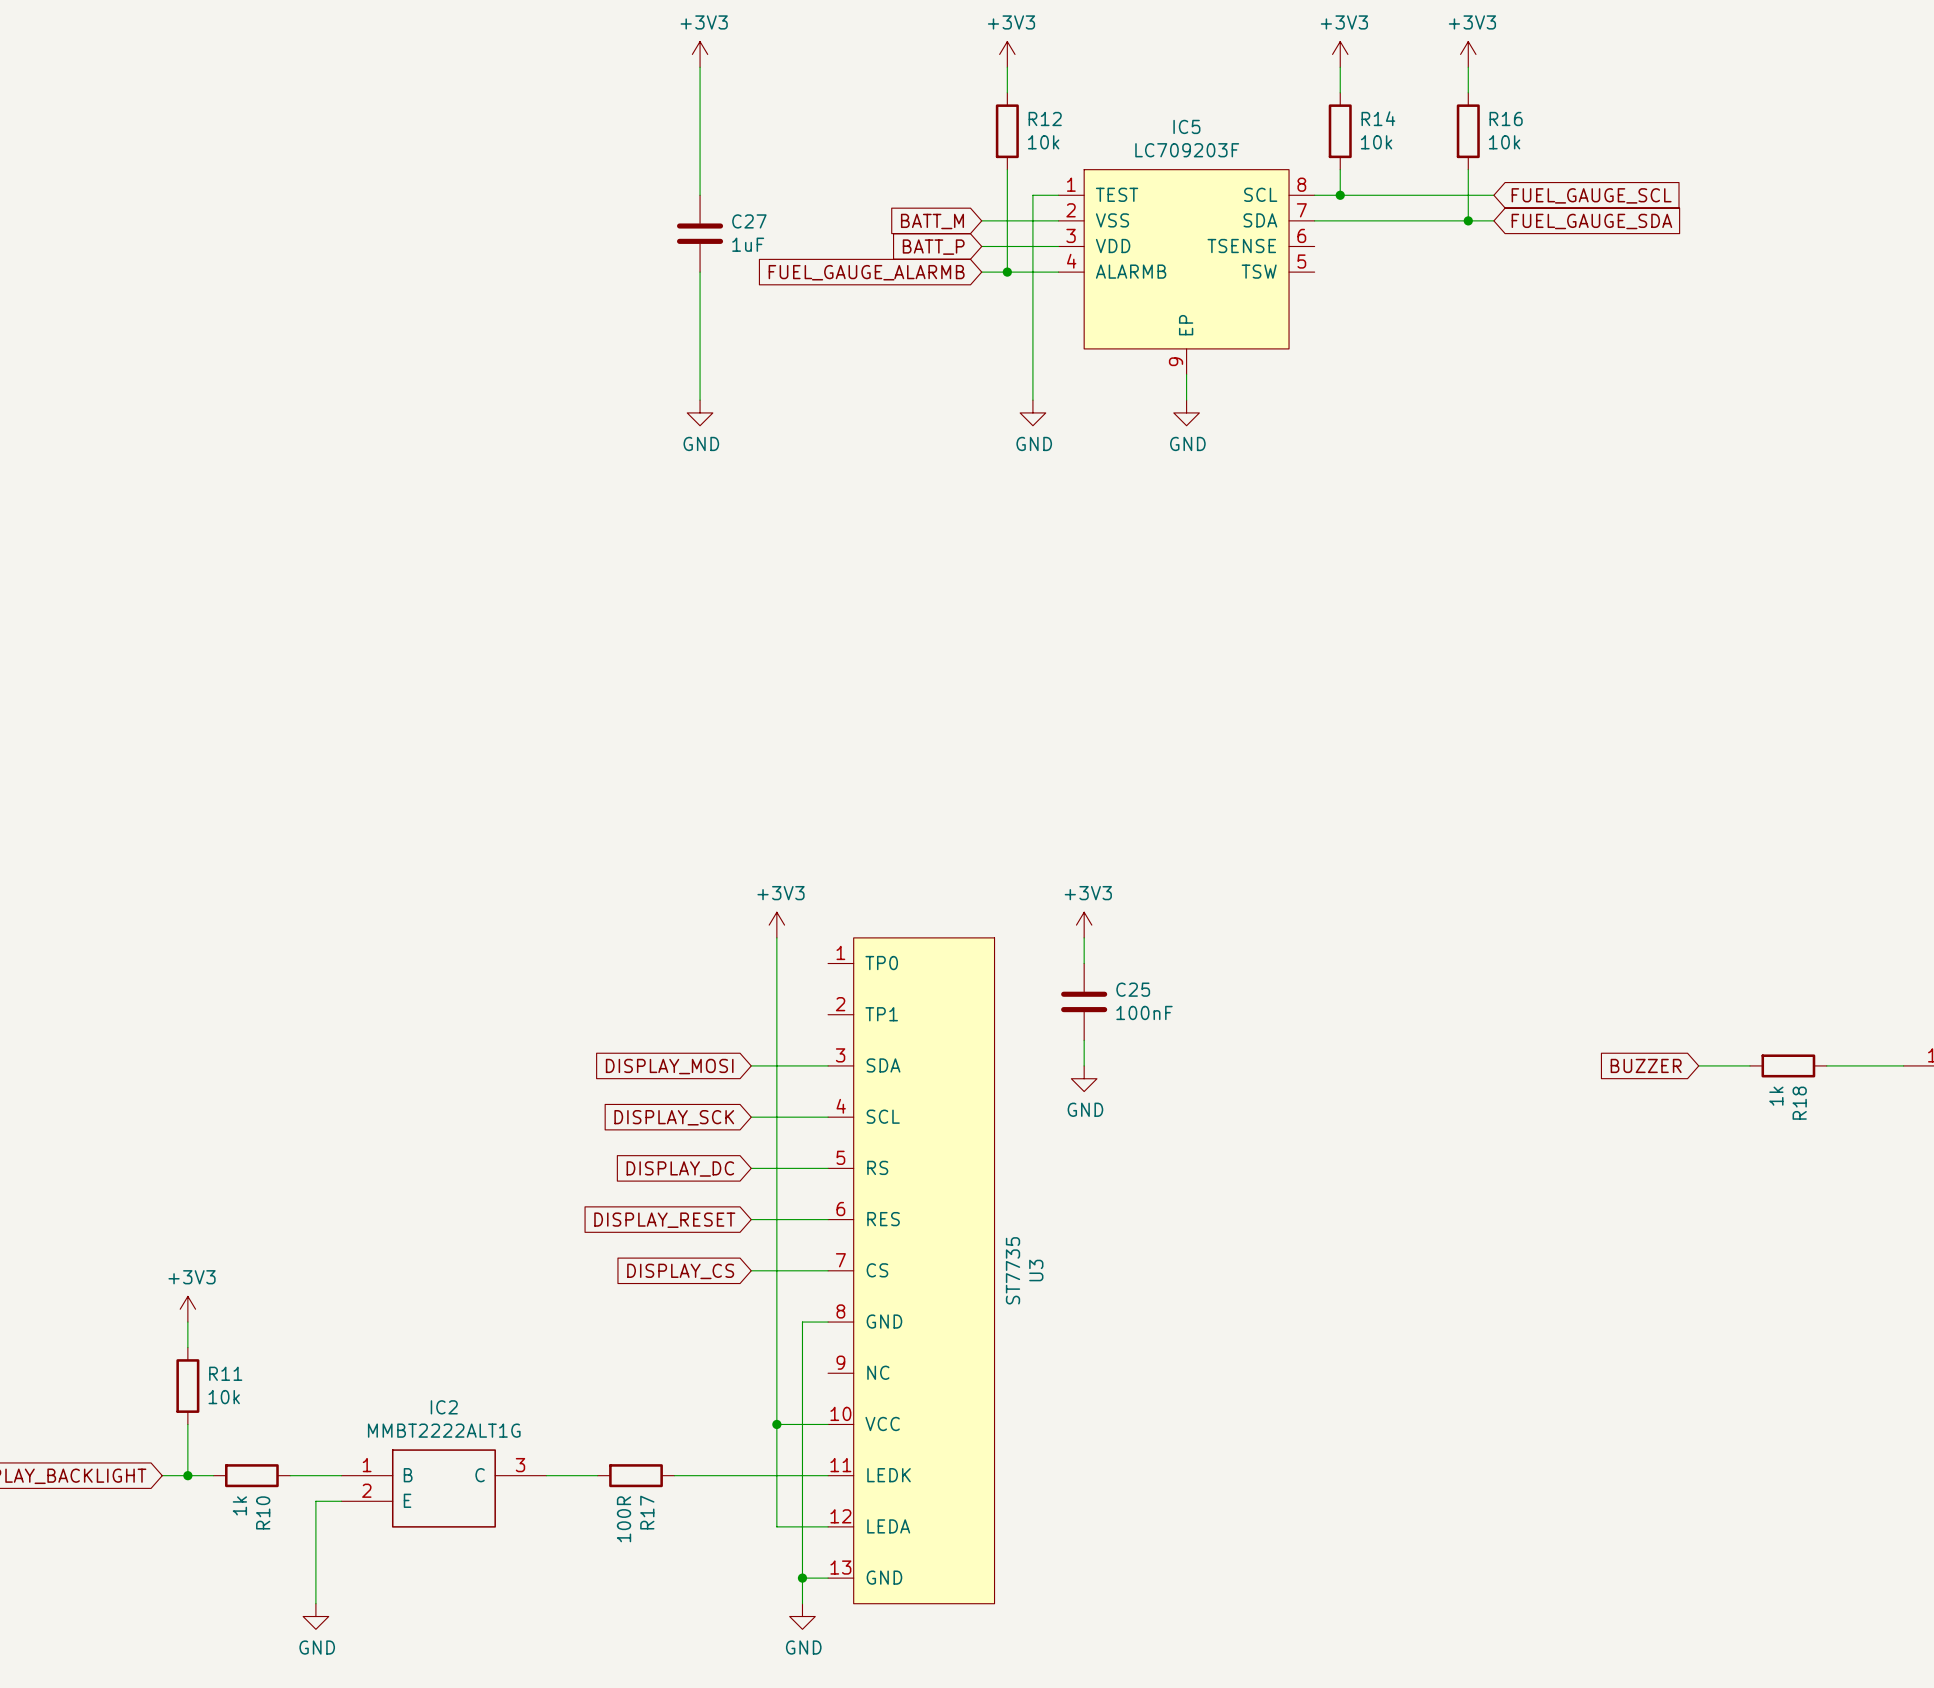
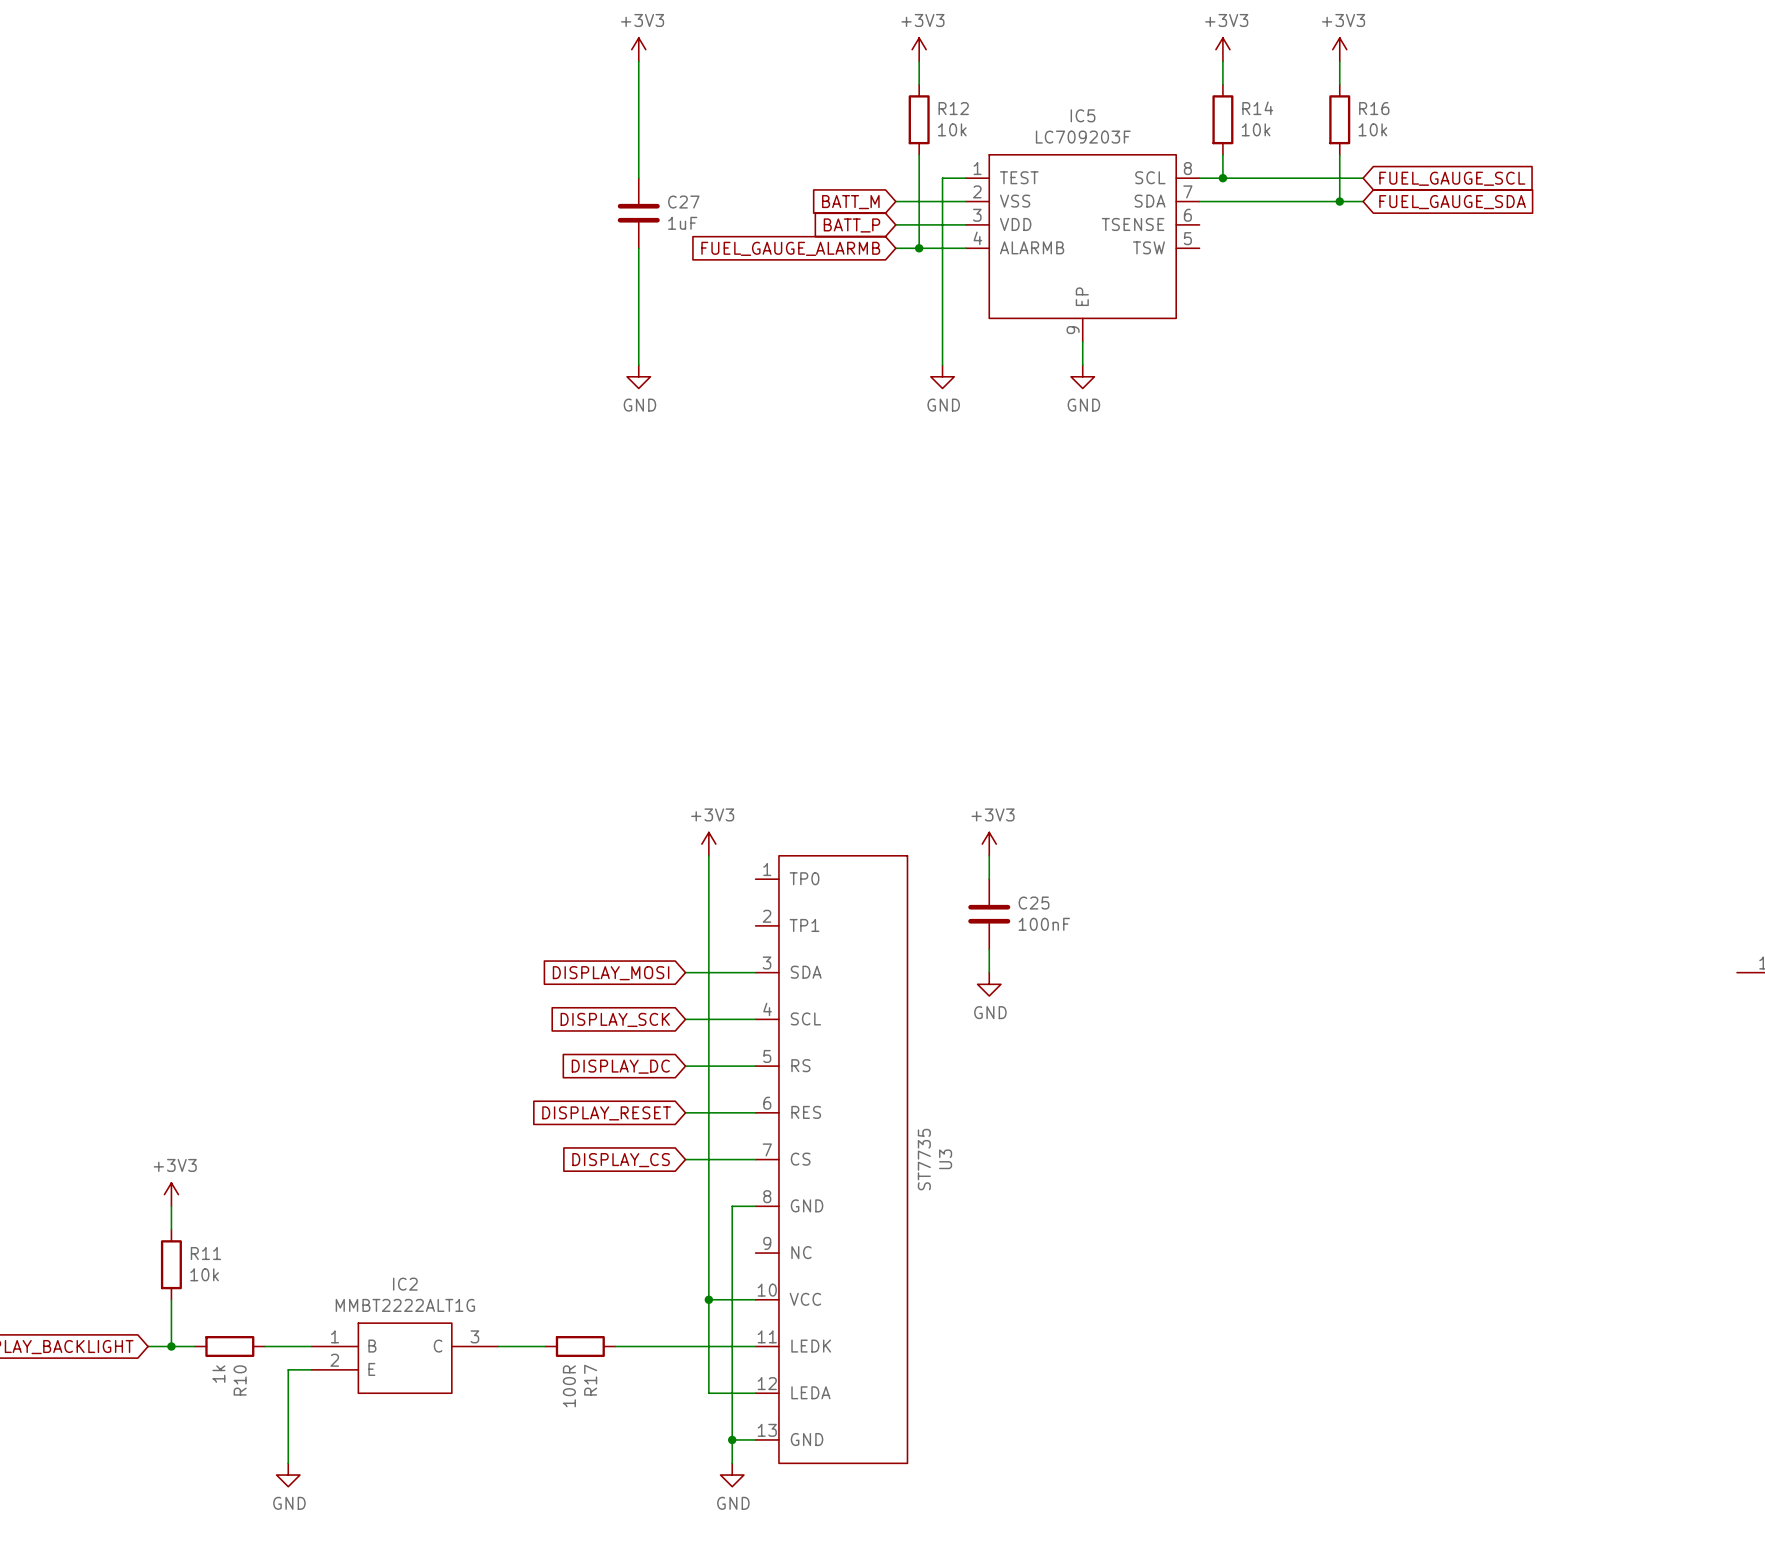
global label: BUZZER (1646, 1065) -> none
wire: (1698, 1065) (1749, 1065) -> none
R18: 1k (1788, 1065) -> none
wire: (1826, 1065) (1903, 1065) -> none

